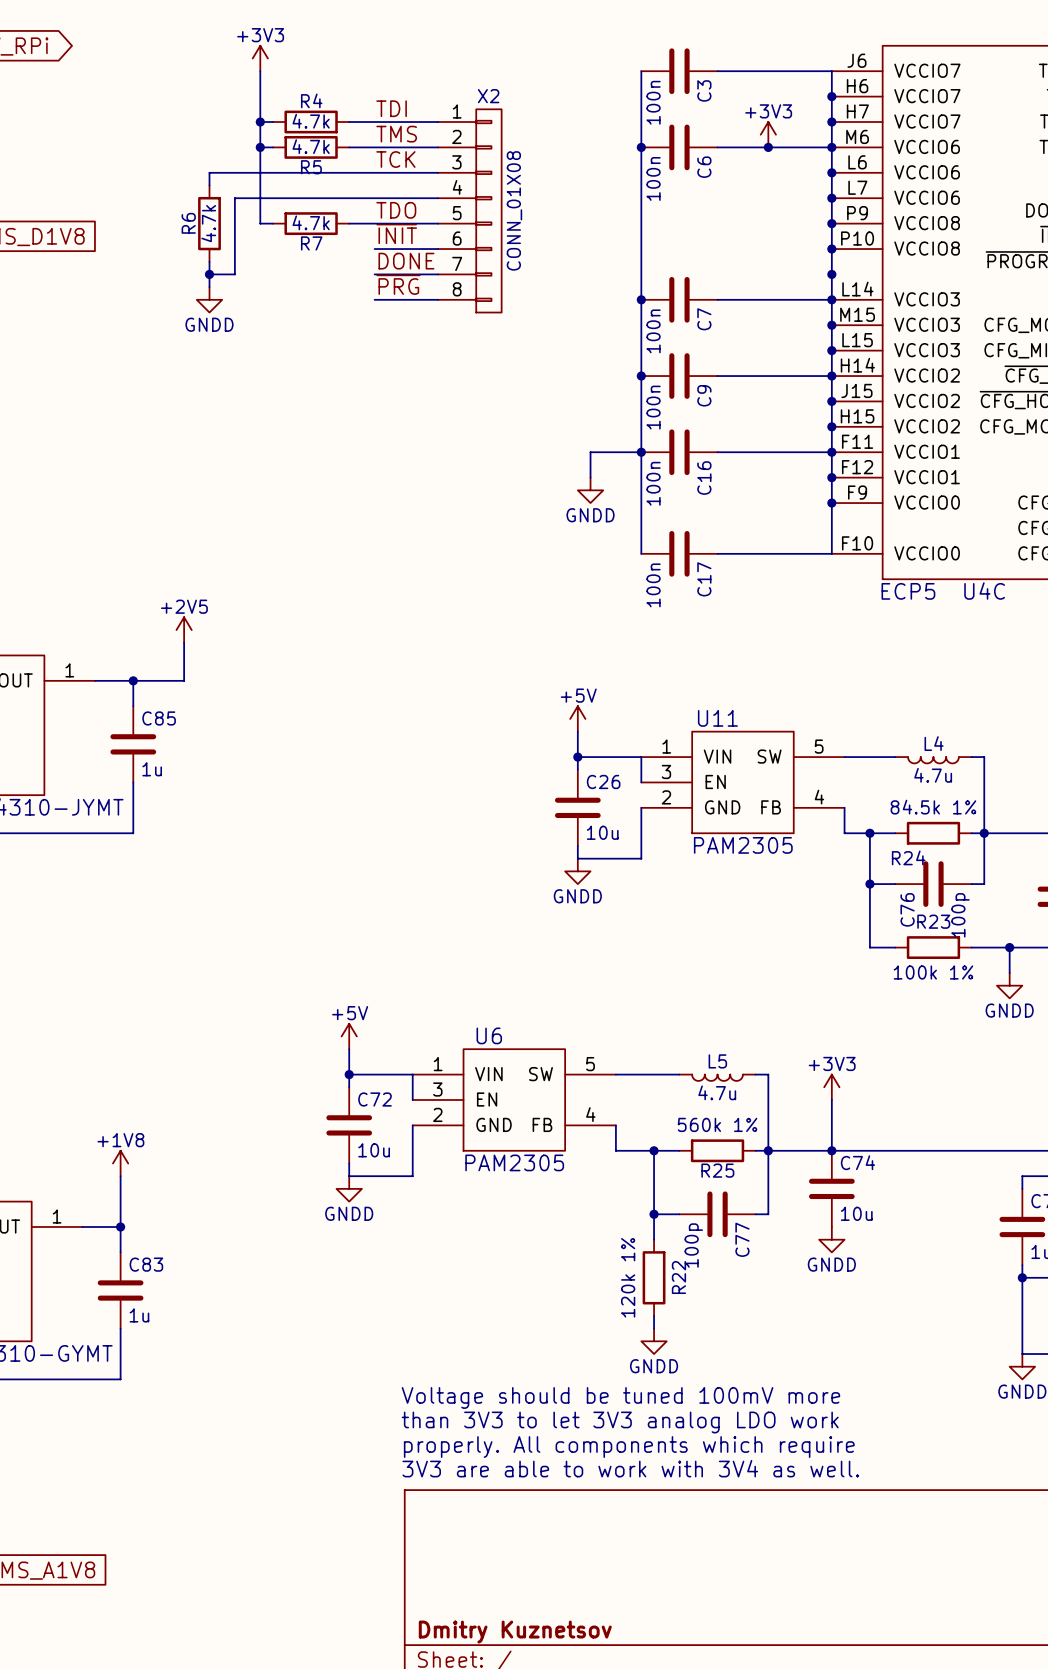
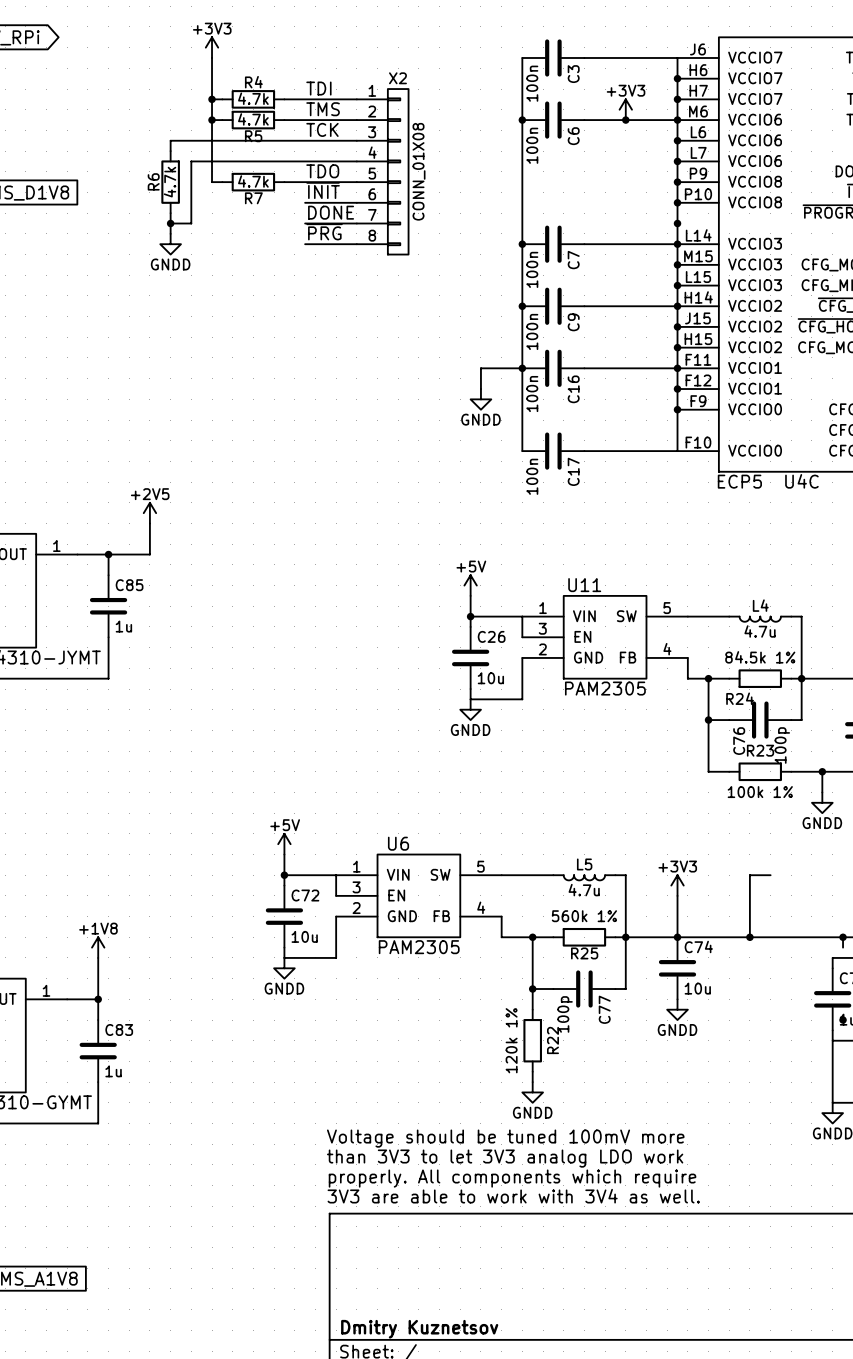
wire: none -> (770, 875) (749, 875) (749, 937)
junction: none -> (749, 937)
wire: none -> (843, 937) (843, 947)
junction: none -> (843, 937)
junction: none -> (843, 1020)
junction: (1022, 1277) -> none

